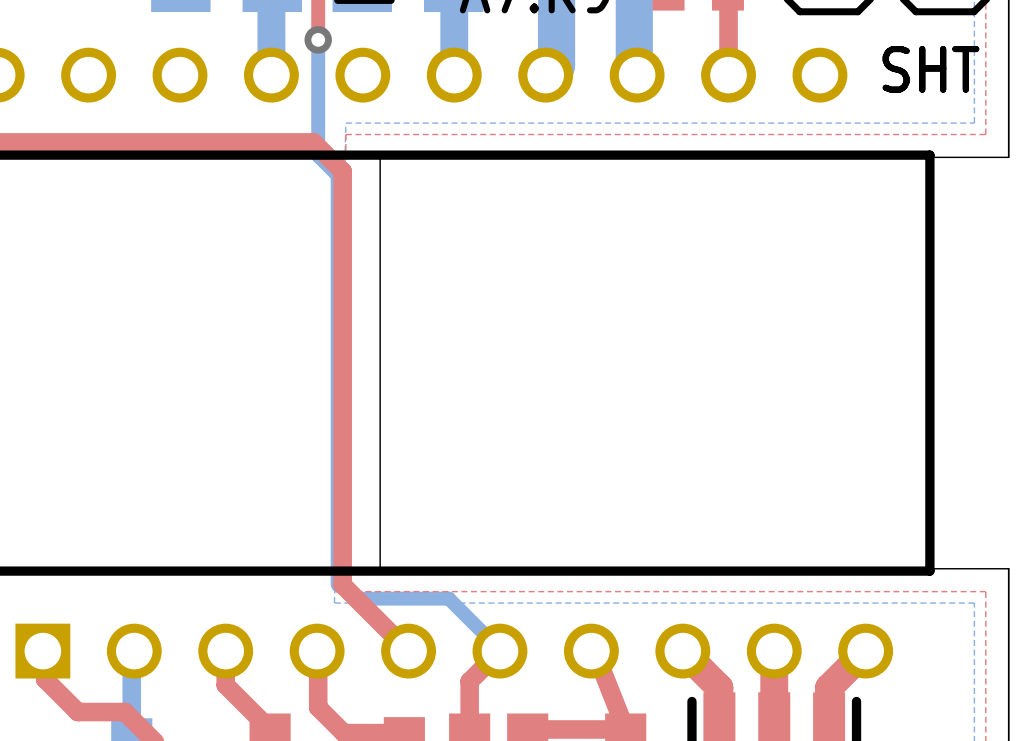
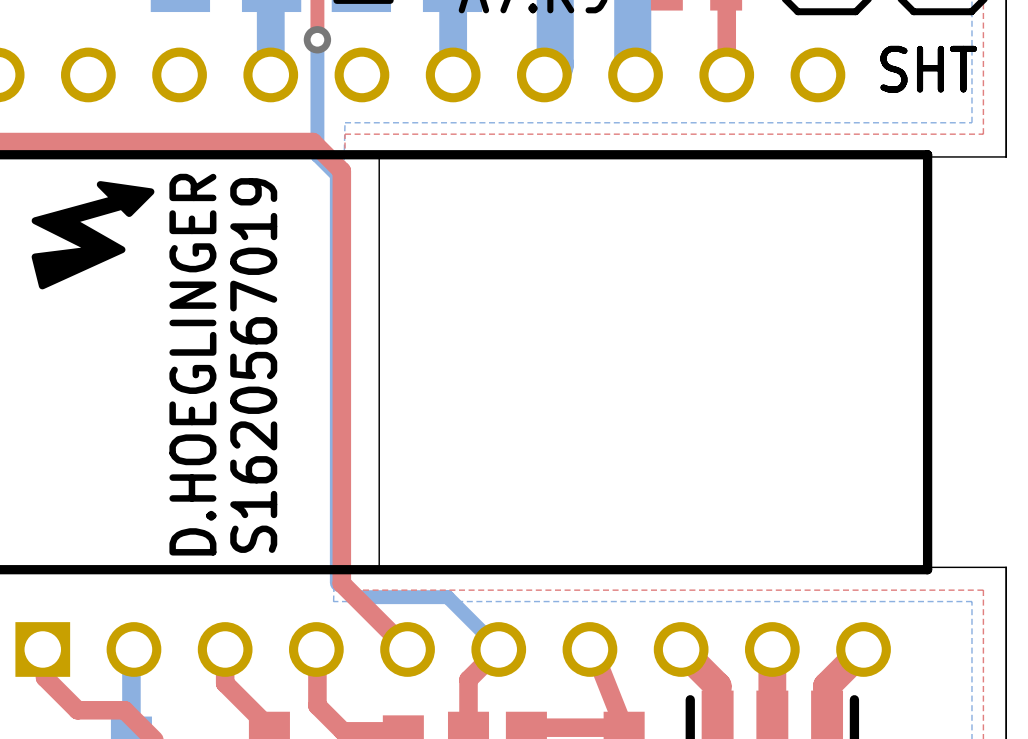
drawing: none -> [31, 181, 155, 290]
text: none -> D.HOEGLINGER (192, 364)
text: none -> S1620567019 (253, 365)

